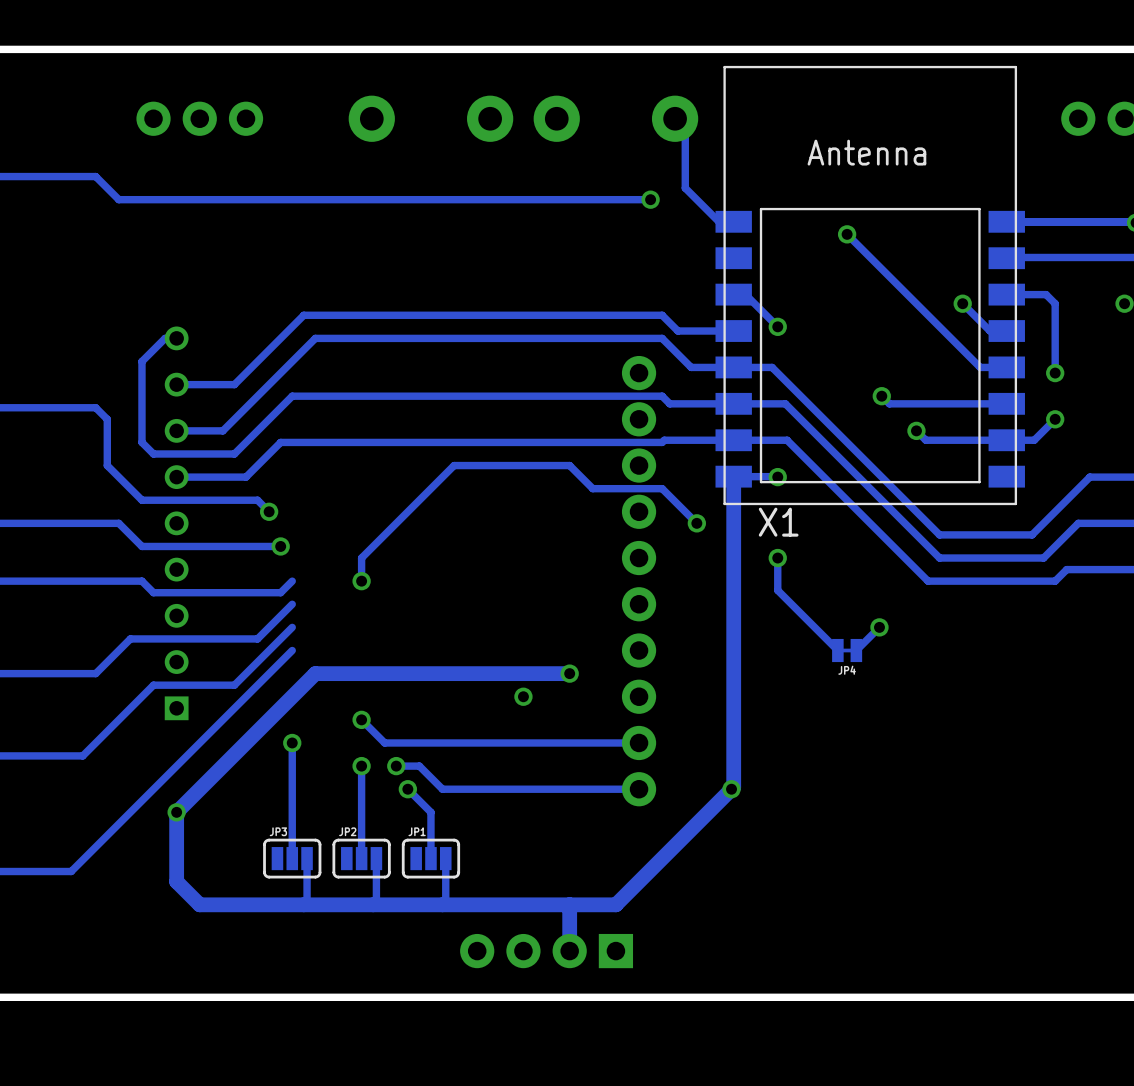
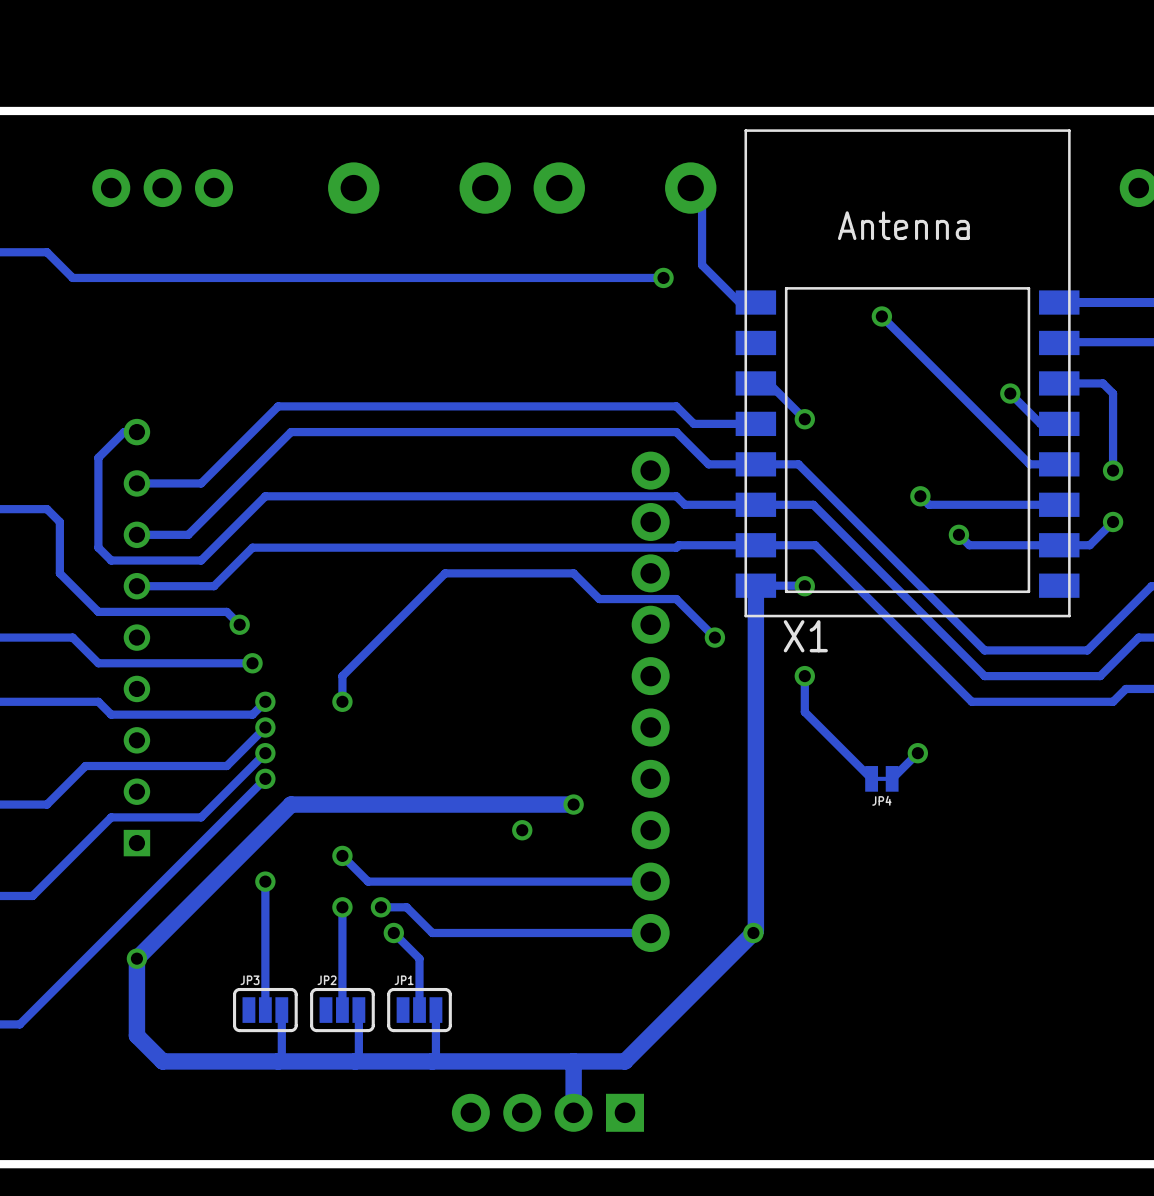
via: none -> (265, 701)
via: none -> (265, 727)
via: none -> (265, 753)
via: none -> (265, 778)

